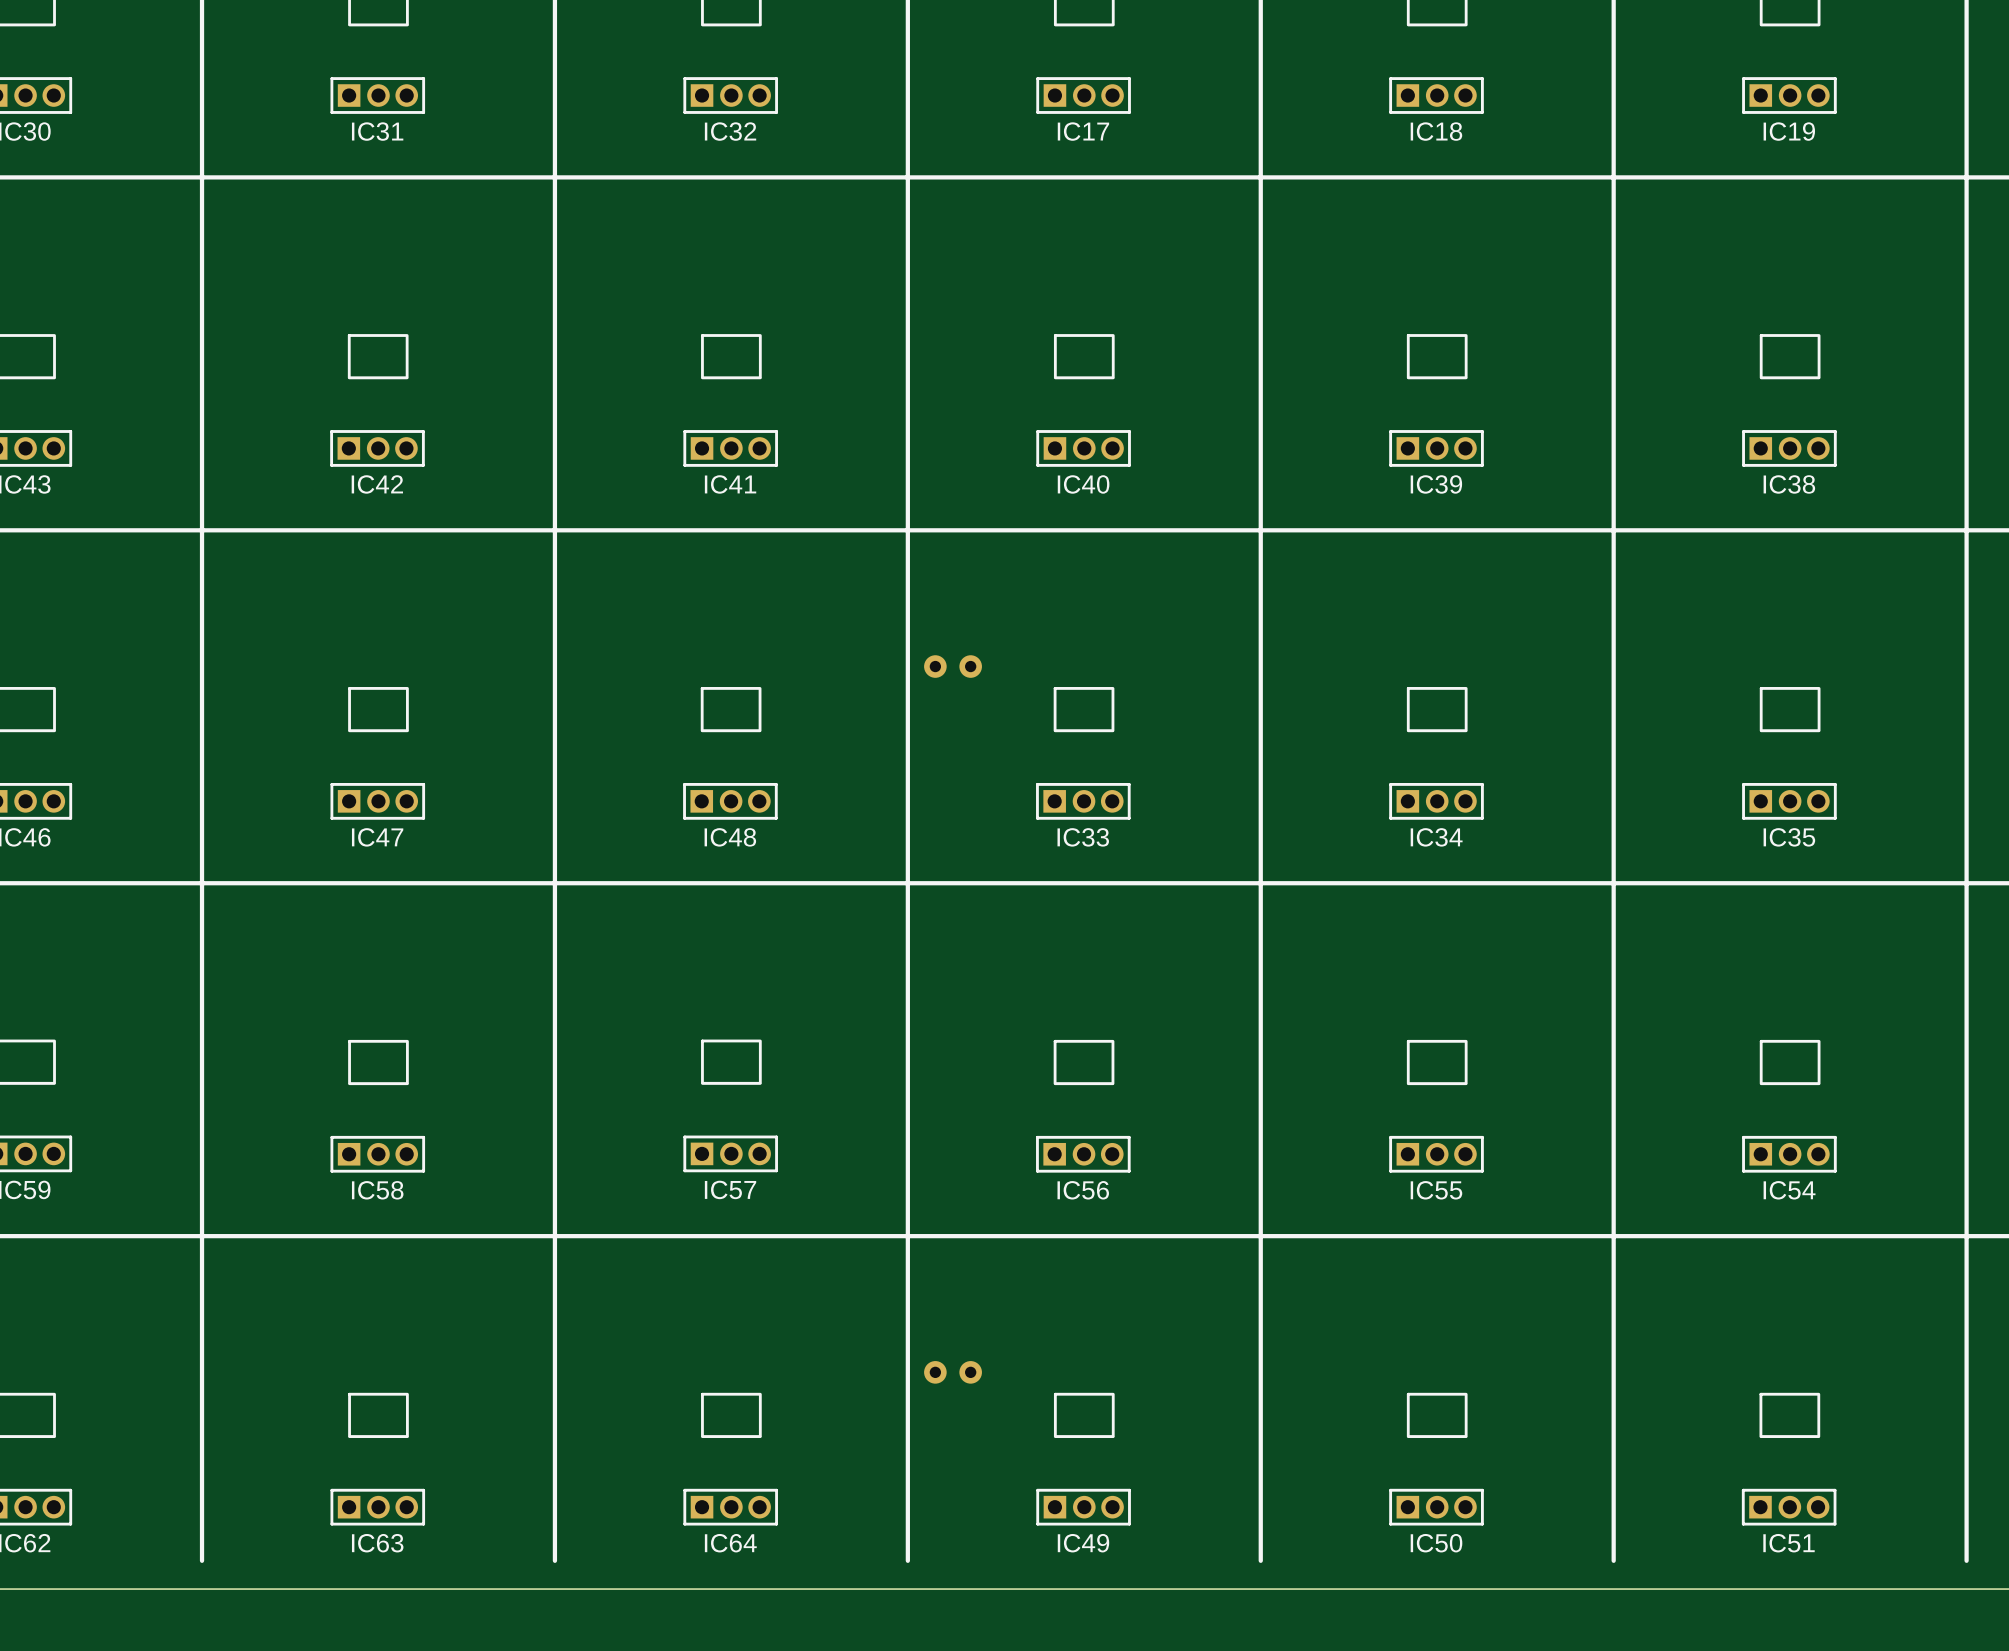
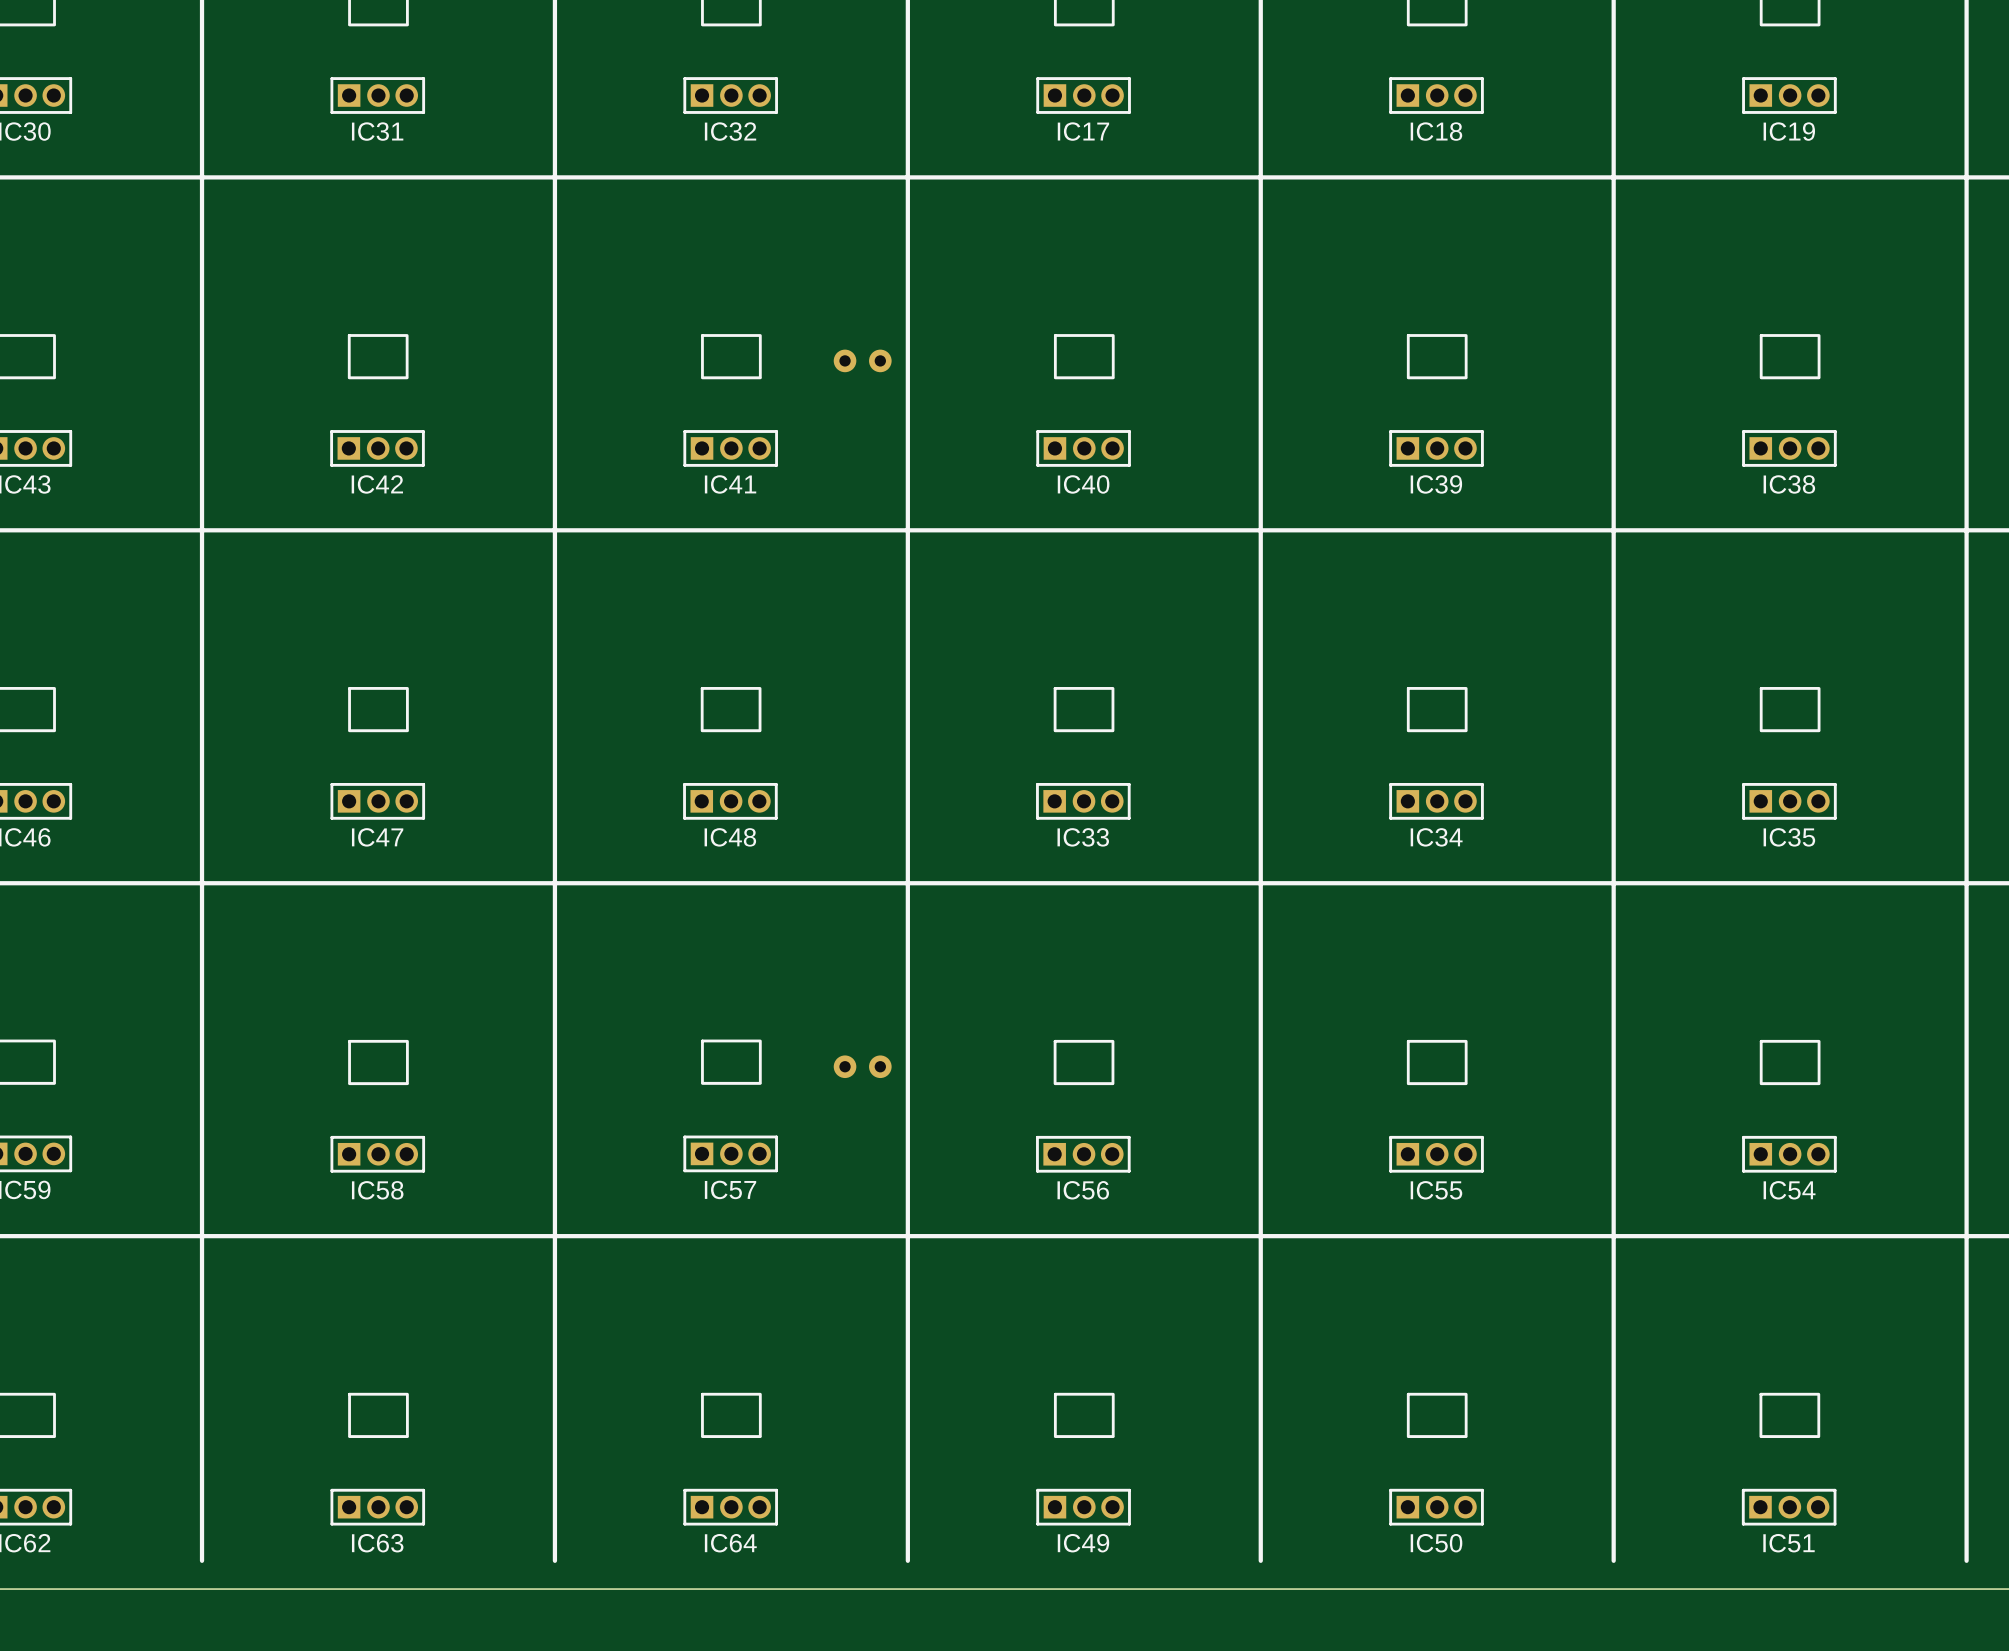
part: none -> (862, 360)
part: (953, 666) -> none
part: none -> (862, 1066)
part: (953, 1372) -> none

